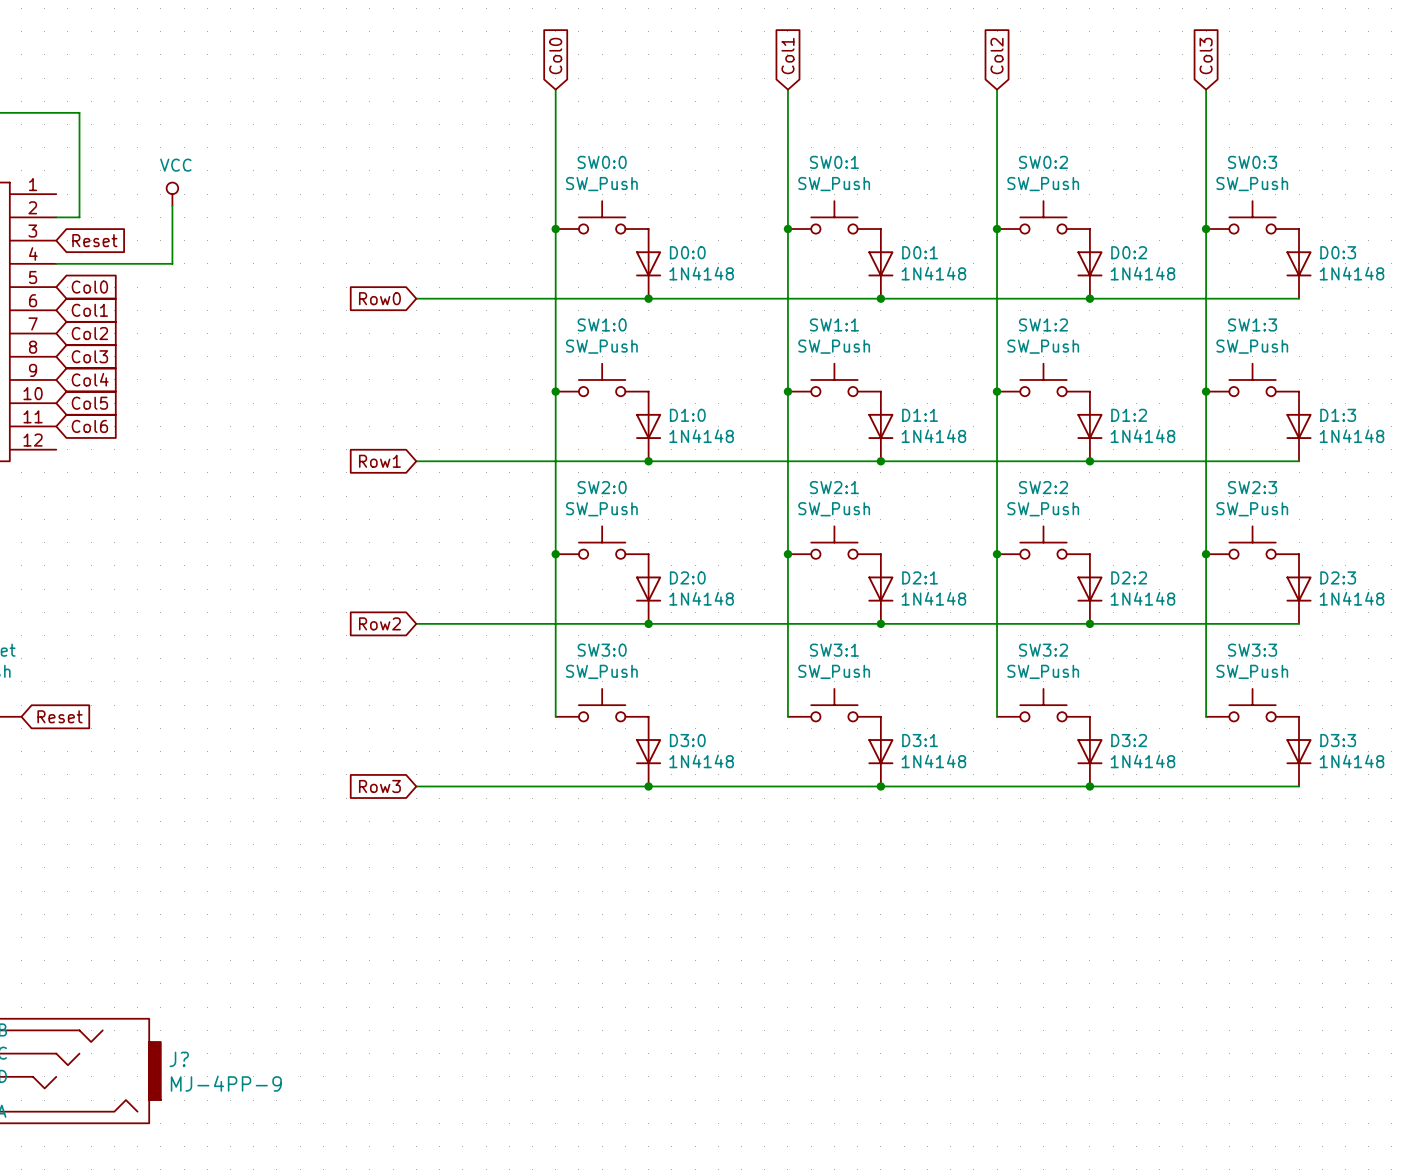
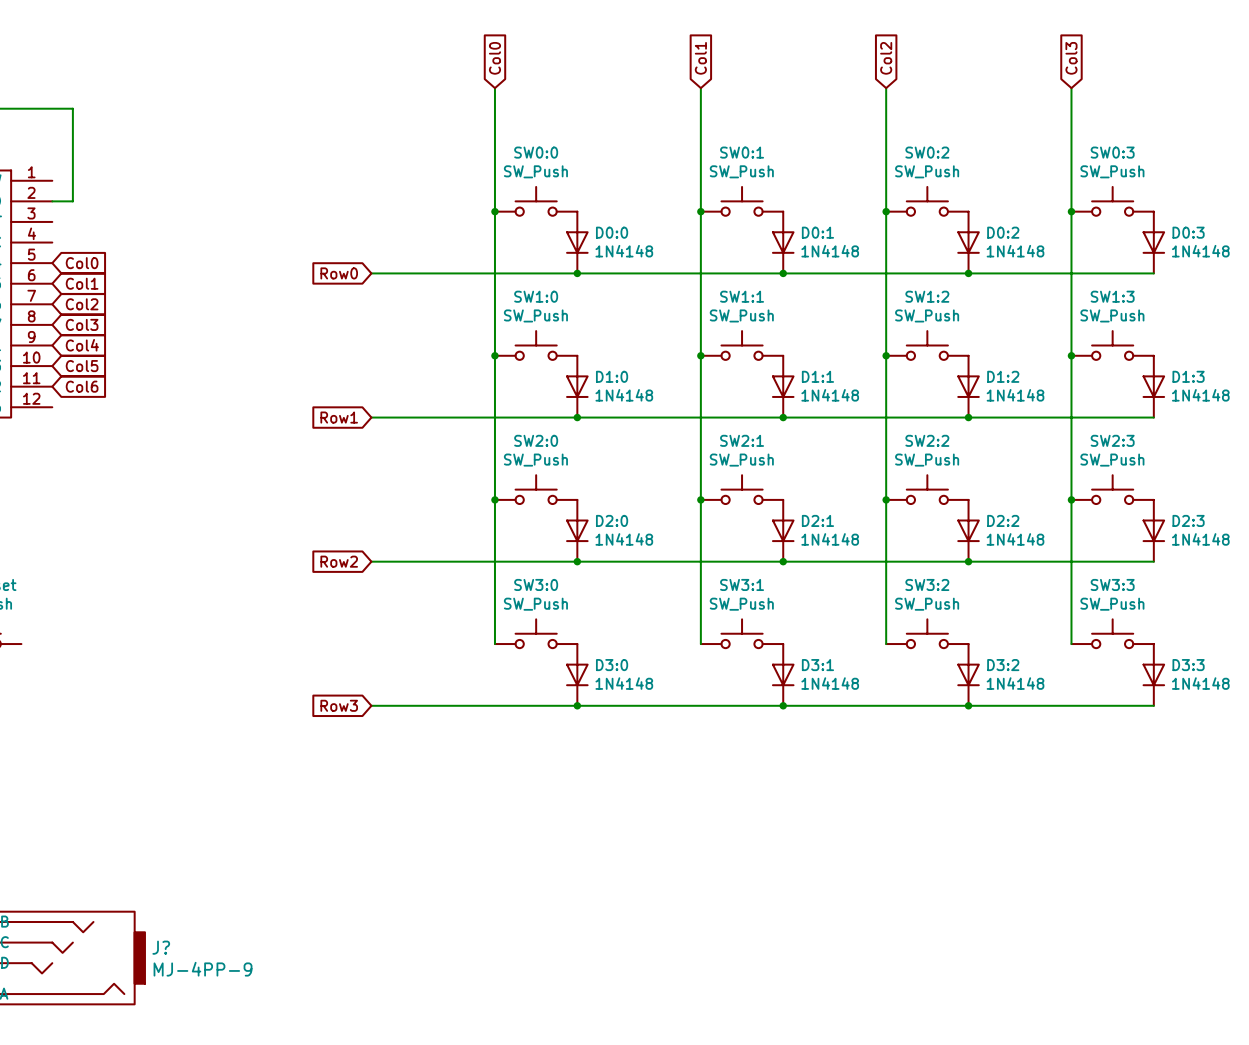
power symbol: VCC (172, 194) -> none
wire: (172, 205) (172, 263) (56, 263) -> none
global label: Reset (94, 240) -> none
global label: Reset (60, 716) -> none

